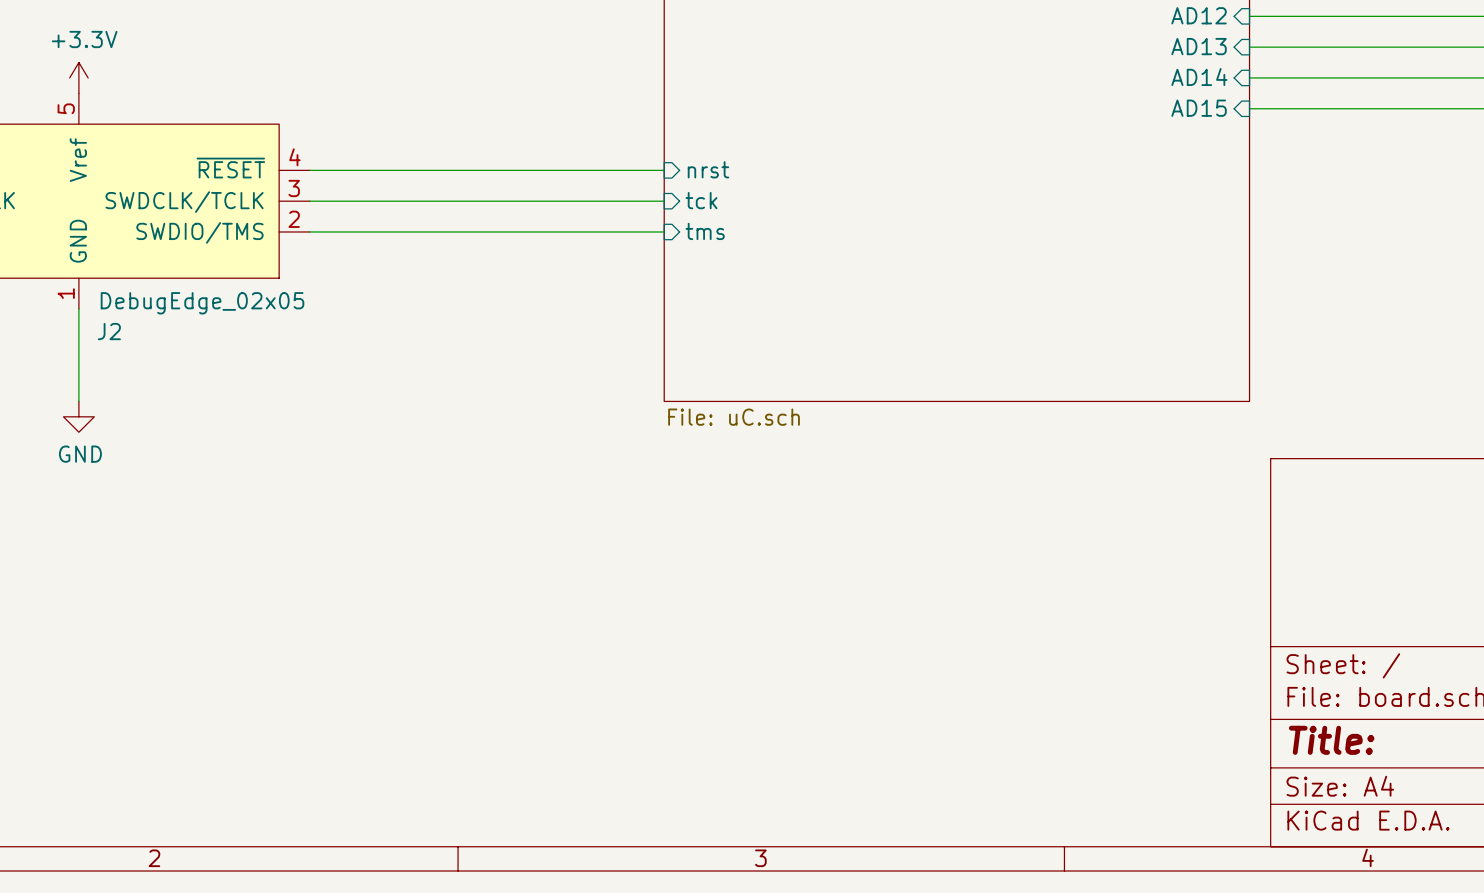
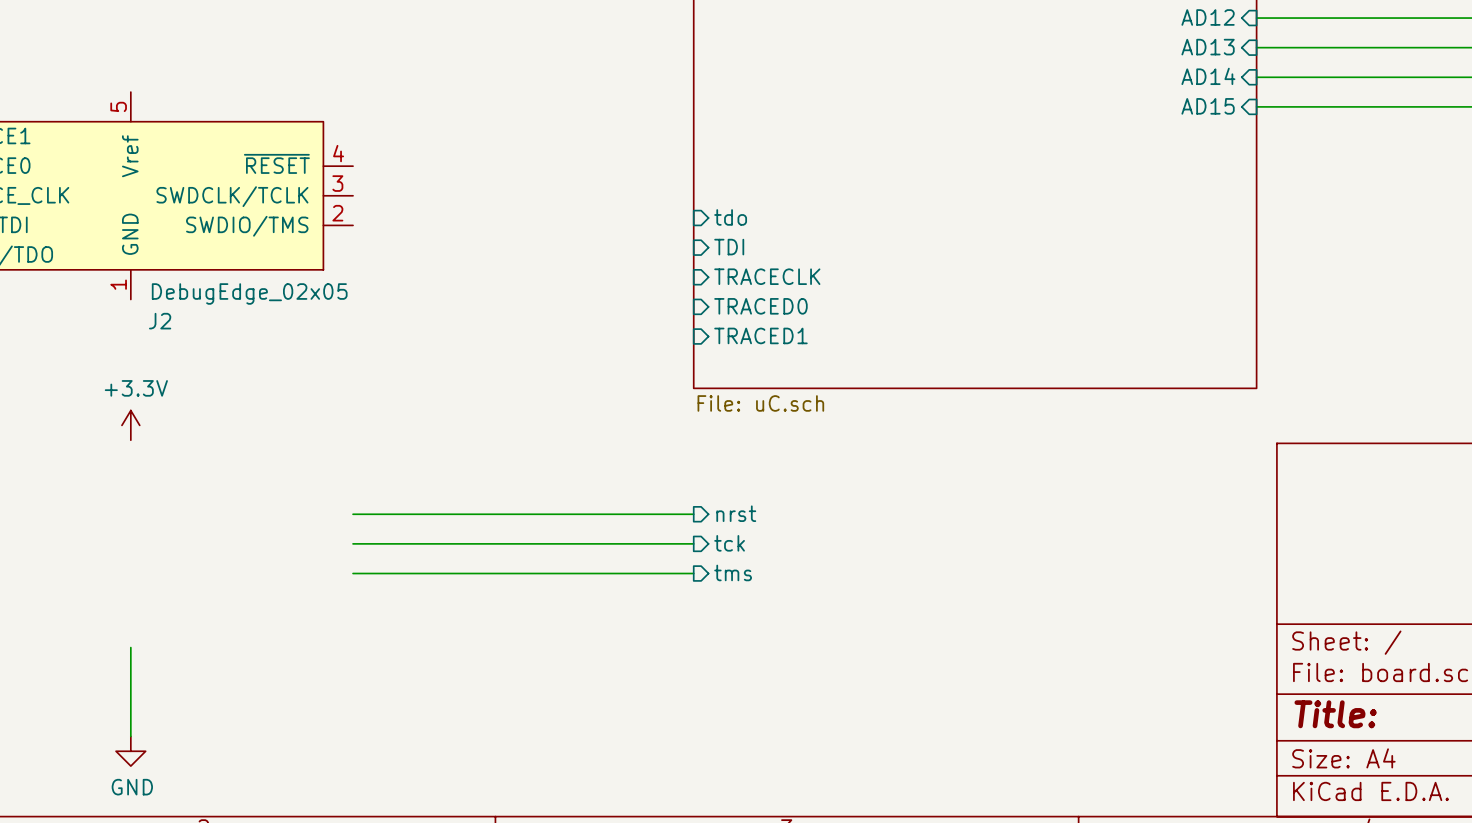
power symbol: +3.3V (78, 77) -> none
sheet pin: nrst (708, 169) -> none
wire: (309, 170) (664, 170) -> none
sheet pin: tck (701, 200) -> none
wire: (309, 201) (664, 201) -> none
wire: (309, 231) (664, 231) -> (353, 514) (693, 514)
sheet pin: tms (705, 231) -> tdo (730, 217)
sheet pin: none -> TDI (729, 247)
sheet pin: none -> TRACECLK (767, 276)
wire: (78, 309) (78, 401) -> none
sheet pin: none -> TRACED0 (760, 306)
sheet pin: none -> TRACED1 (760, 335)
power symbol: GND (78, 416) -> none
power symbol: none -> +3.3V (130, 425)
sheet pin: none -> nrst (736, 513)
sheet pin: none -> tck (729, 543)
wire: none -> (353, 543) (693, 543)
wire: none -> (353, 573) (693, 573)
sheet pin: none -> tms (733, 572)
wire: none -> (130, 647) (130, 736)
power symbol: none -> GND (130, 751)

